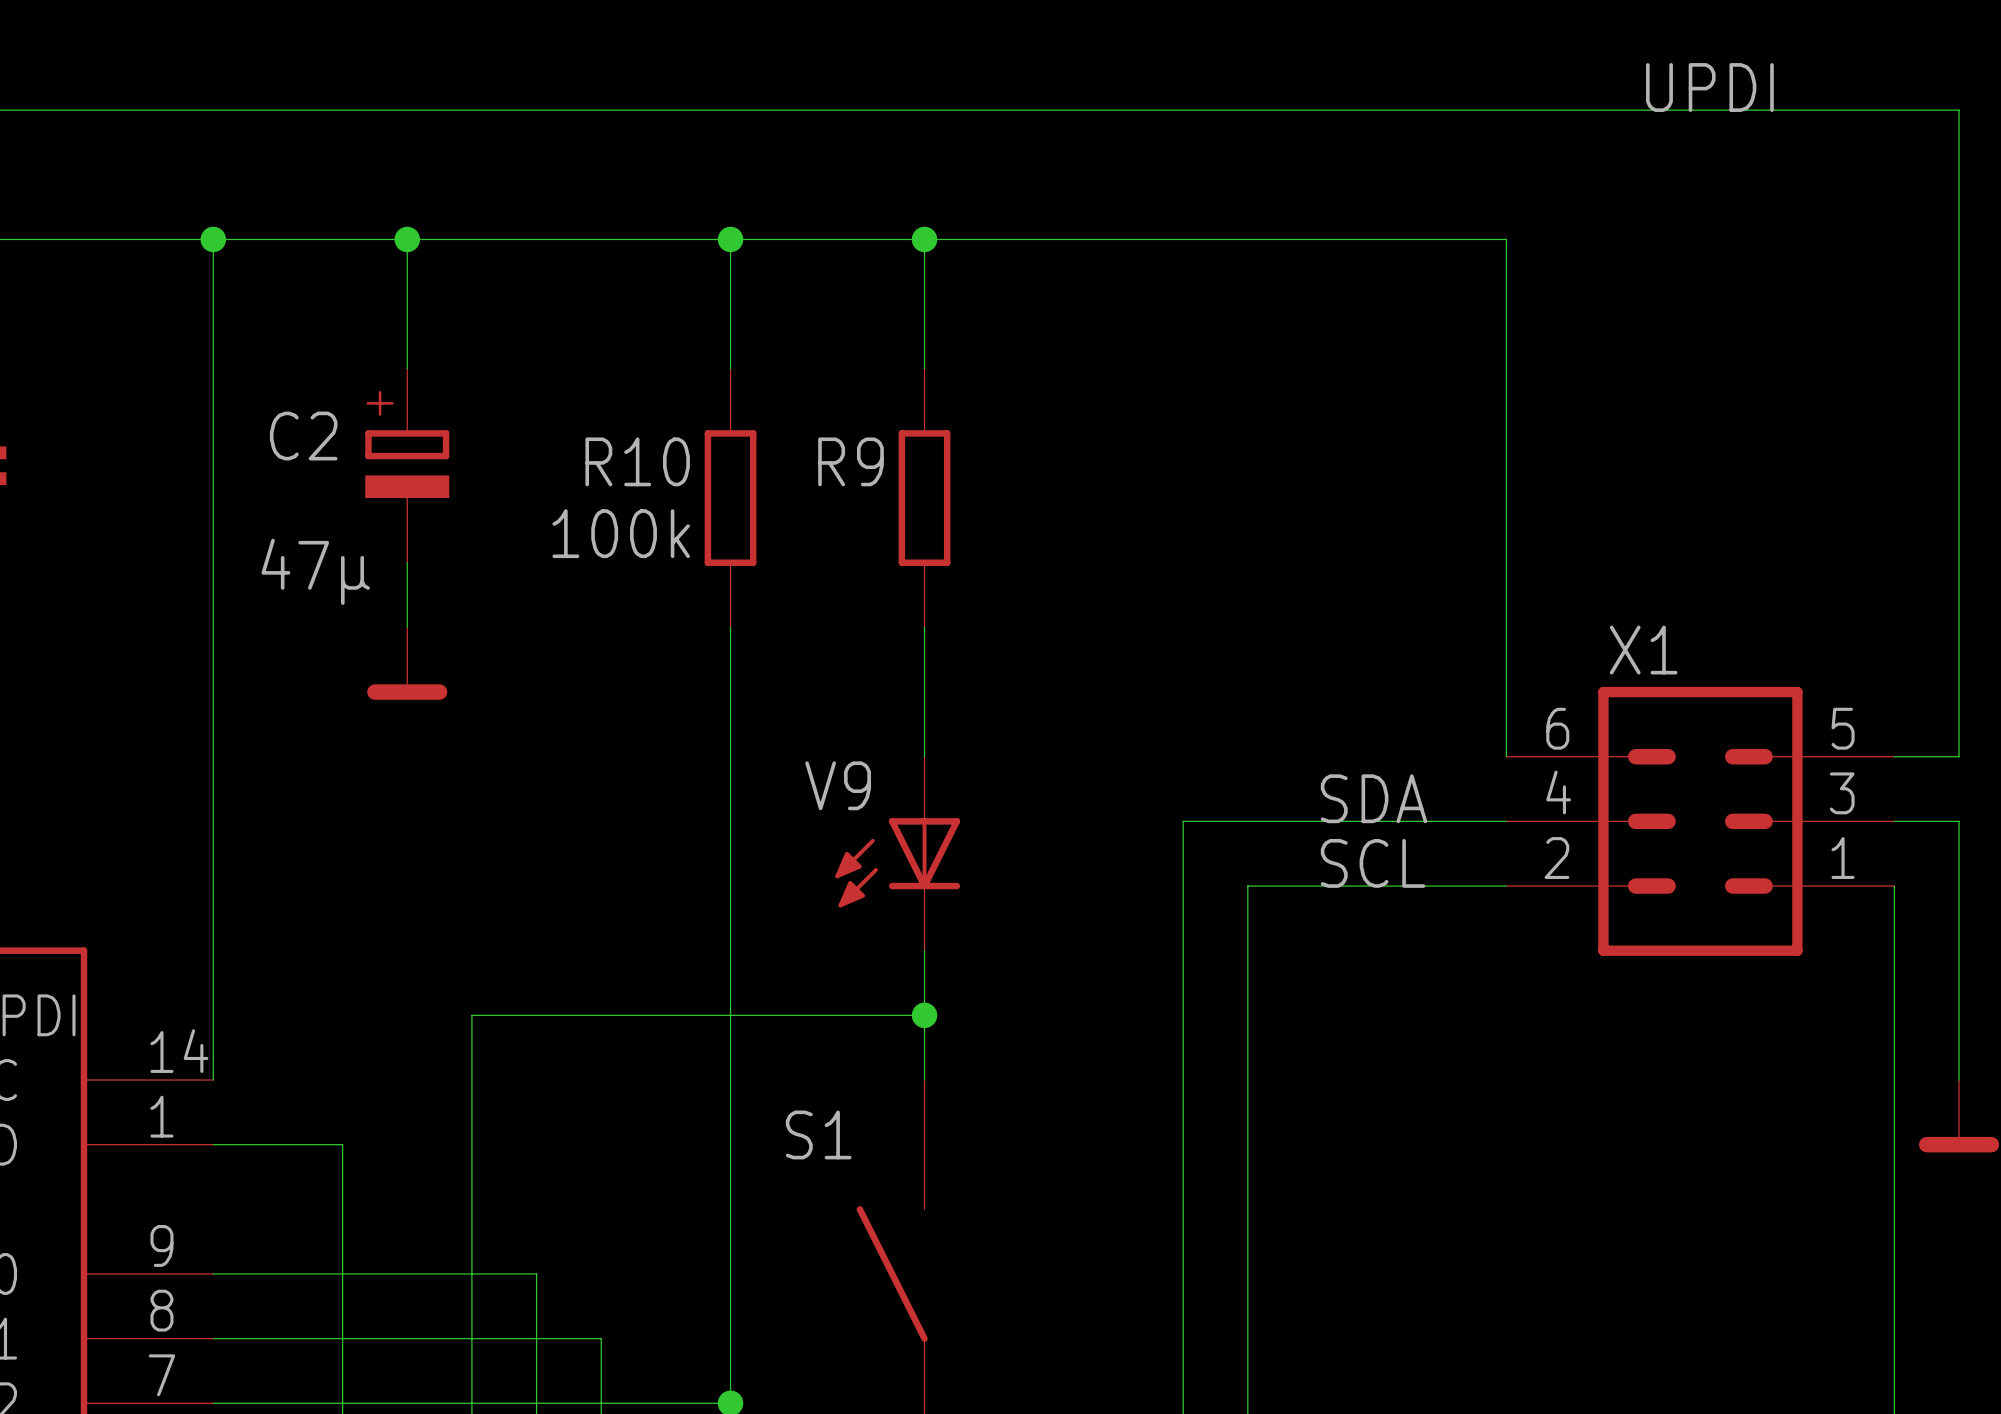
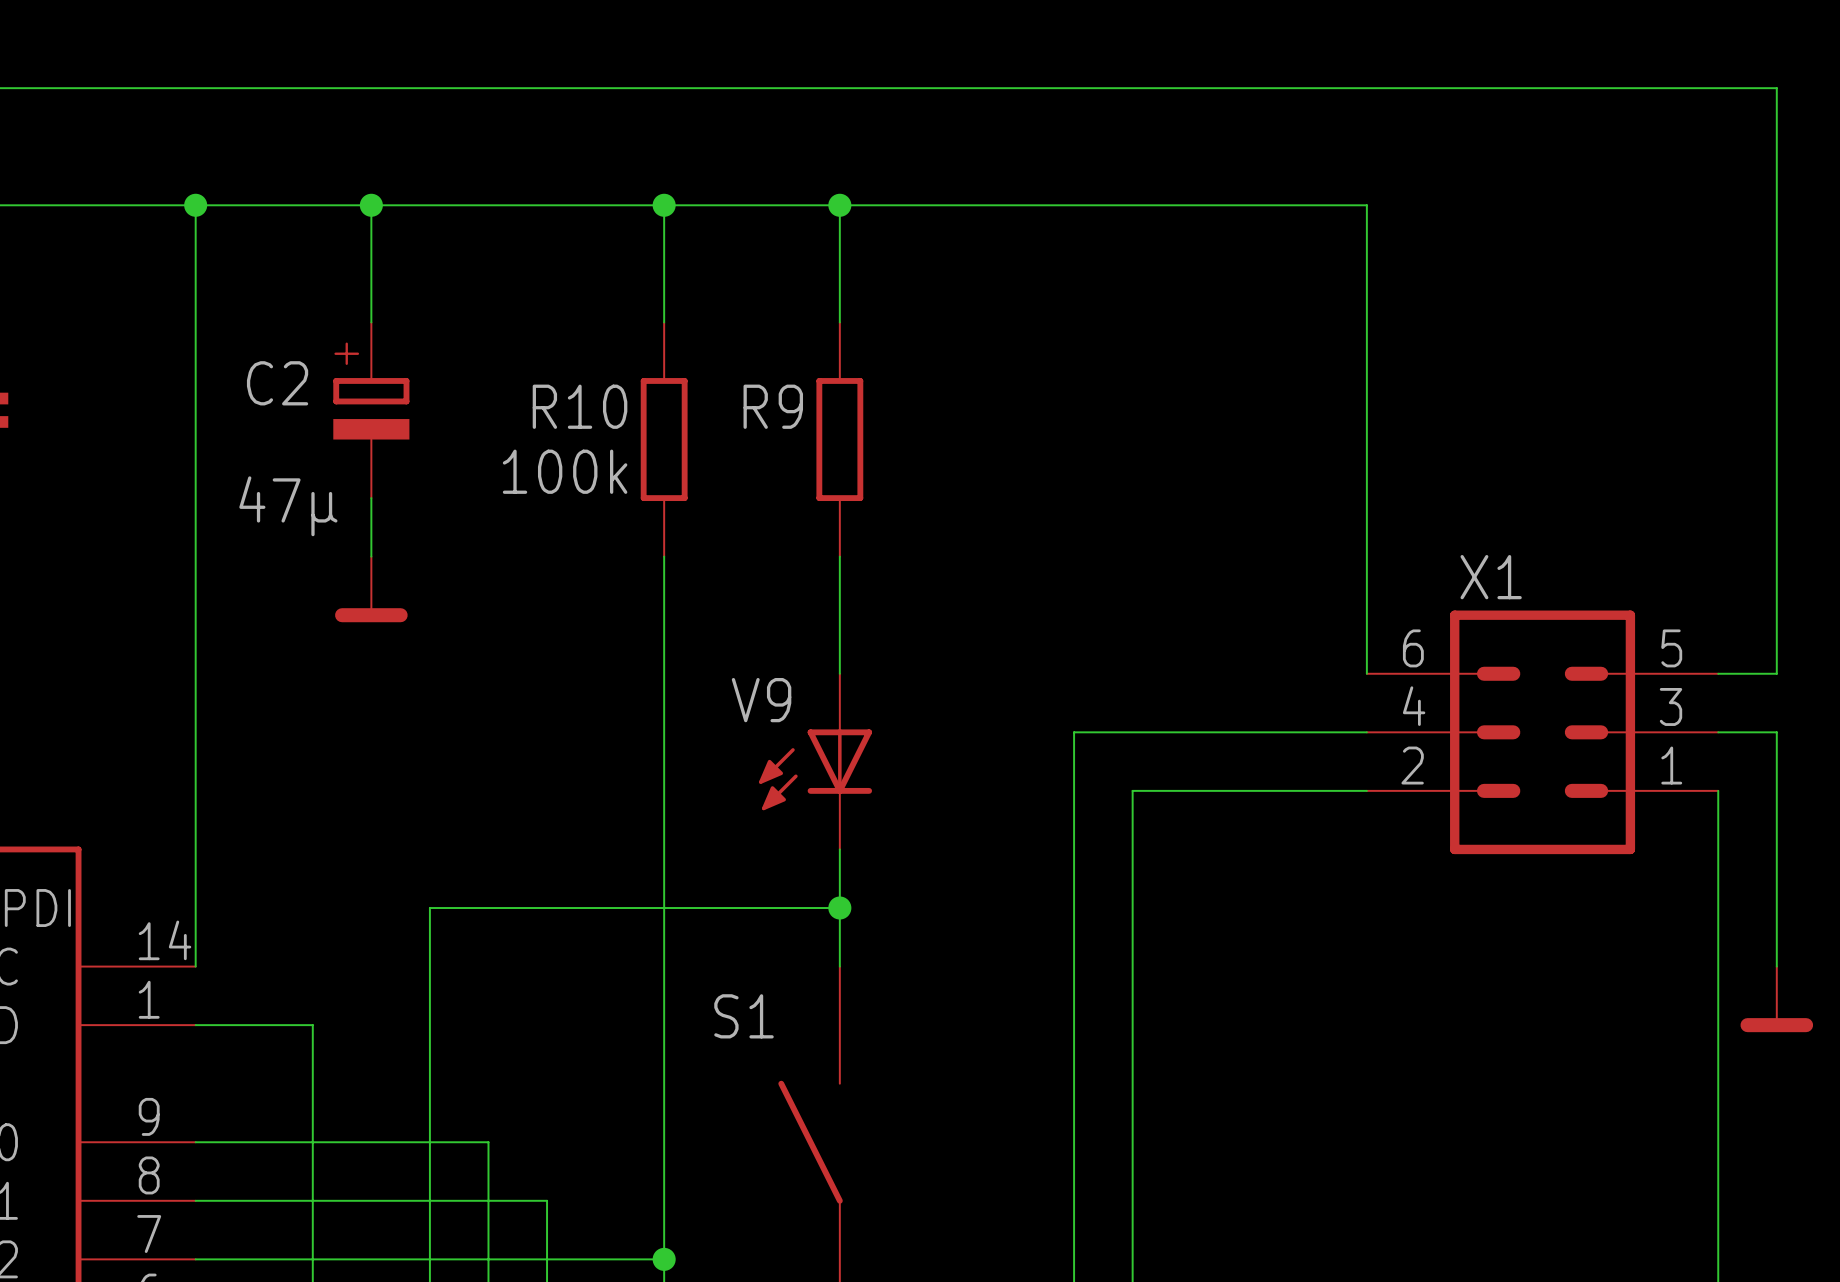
label: UPDI (1709, 87) -> none
label: SDA (1374, 798) -> none
label: SCL (1373, 863) -> none

